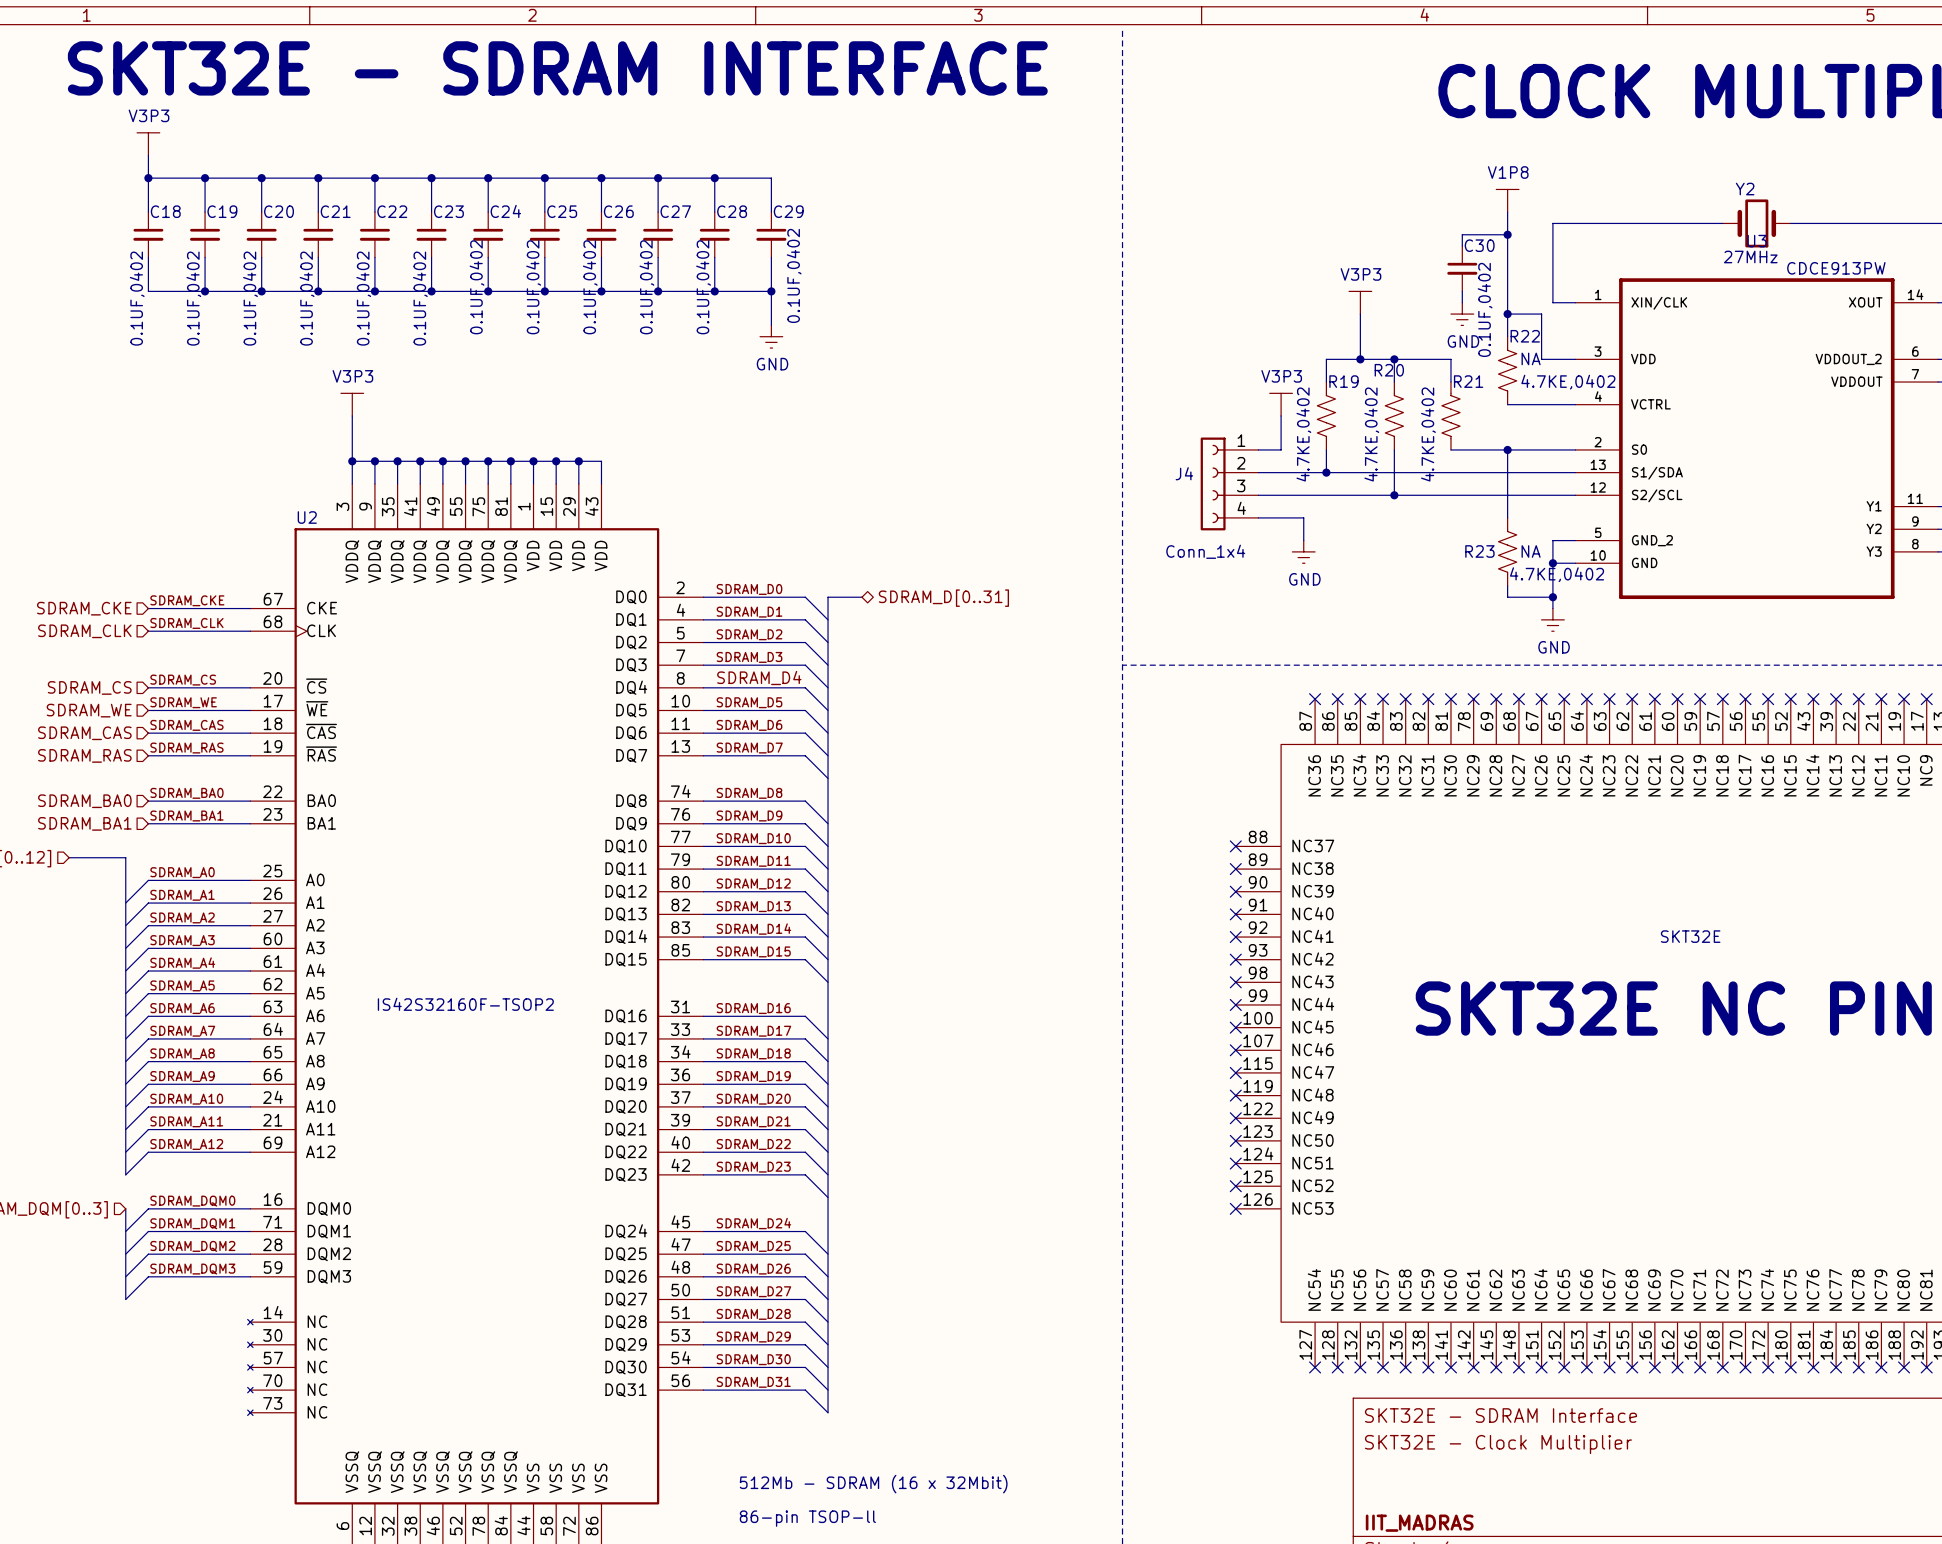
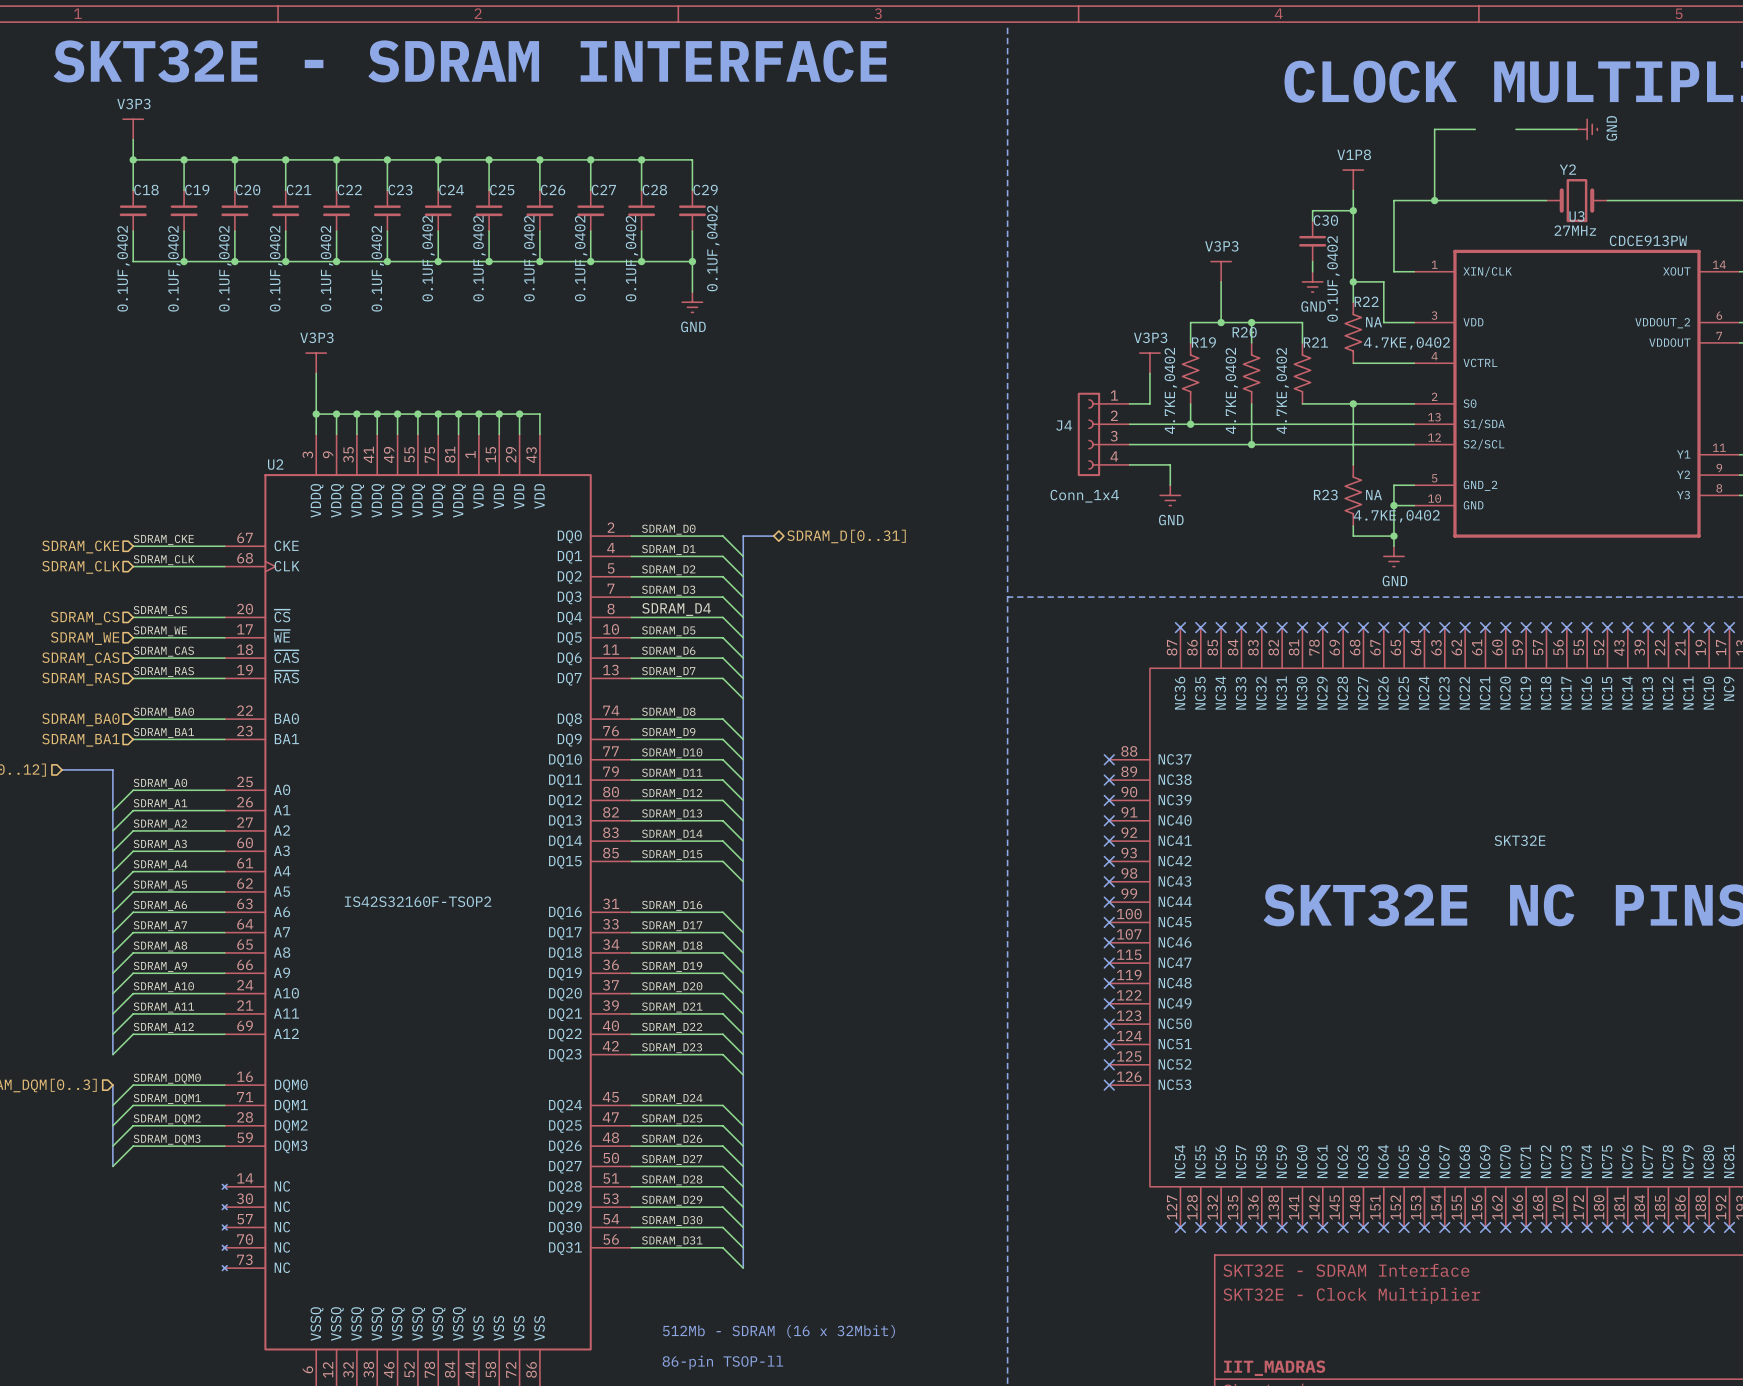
wire: none -> (1475, 129) (1434, 129) (1434, 200)
wire: none -> (1515, 129) (1576, 129)
power symbol: none -> GND (1587, 129)
junction: none -> (1434, 200)

